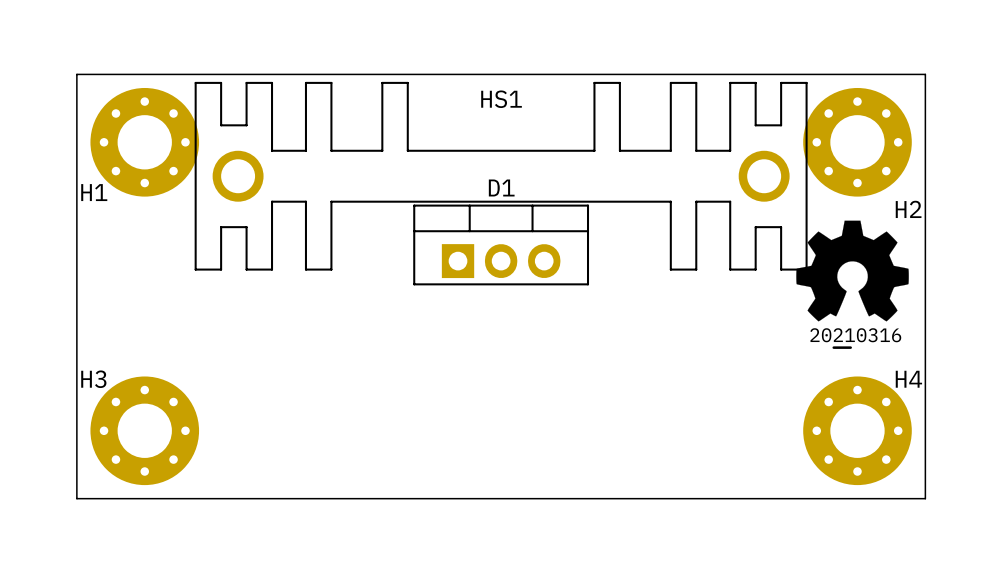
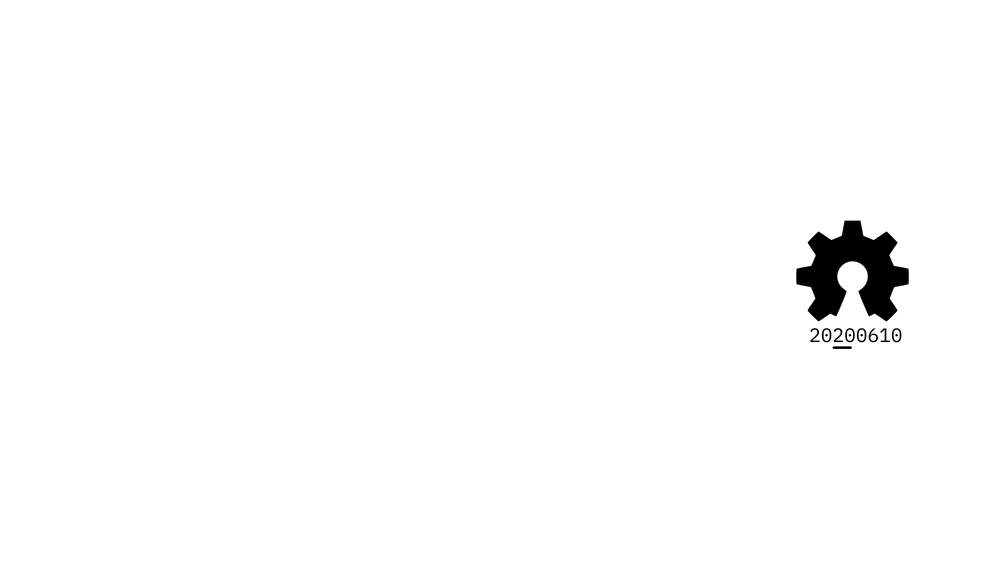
board edge: (76, 74) (925, 74) (925, 498) (76, 498) (76, 74) -> none
H1: (144, 142) -> none
H2: (857, 142) -> none
HS1: (501, 176) -> none
D1: (501, 244) -> none
drawing shape: [810, 328, 902, 349] -> [810, 328, 902, 349]
H3: (144, 430) -> none
H4: (857, 430) -> none

